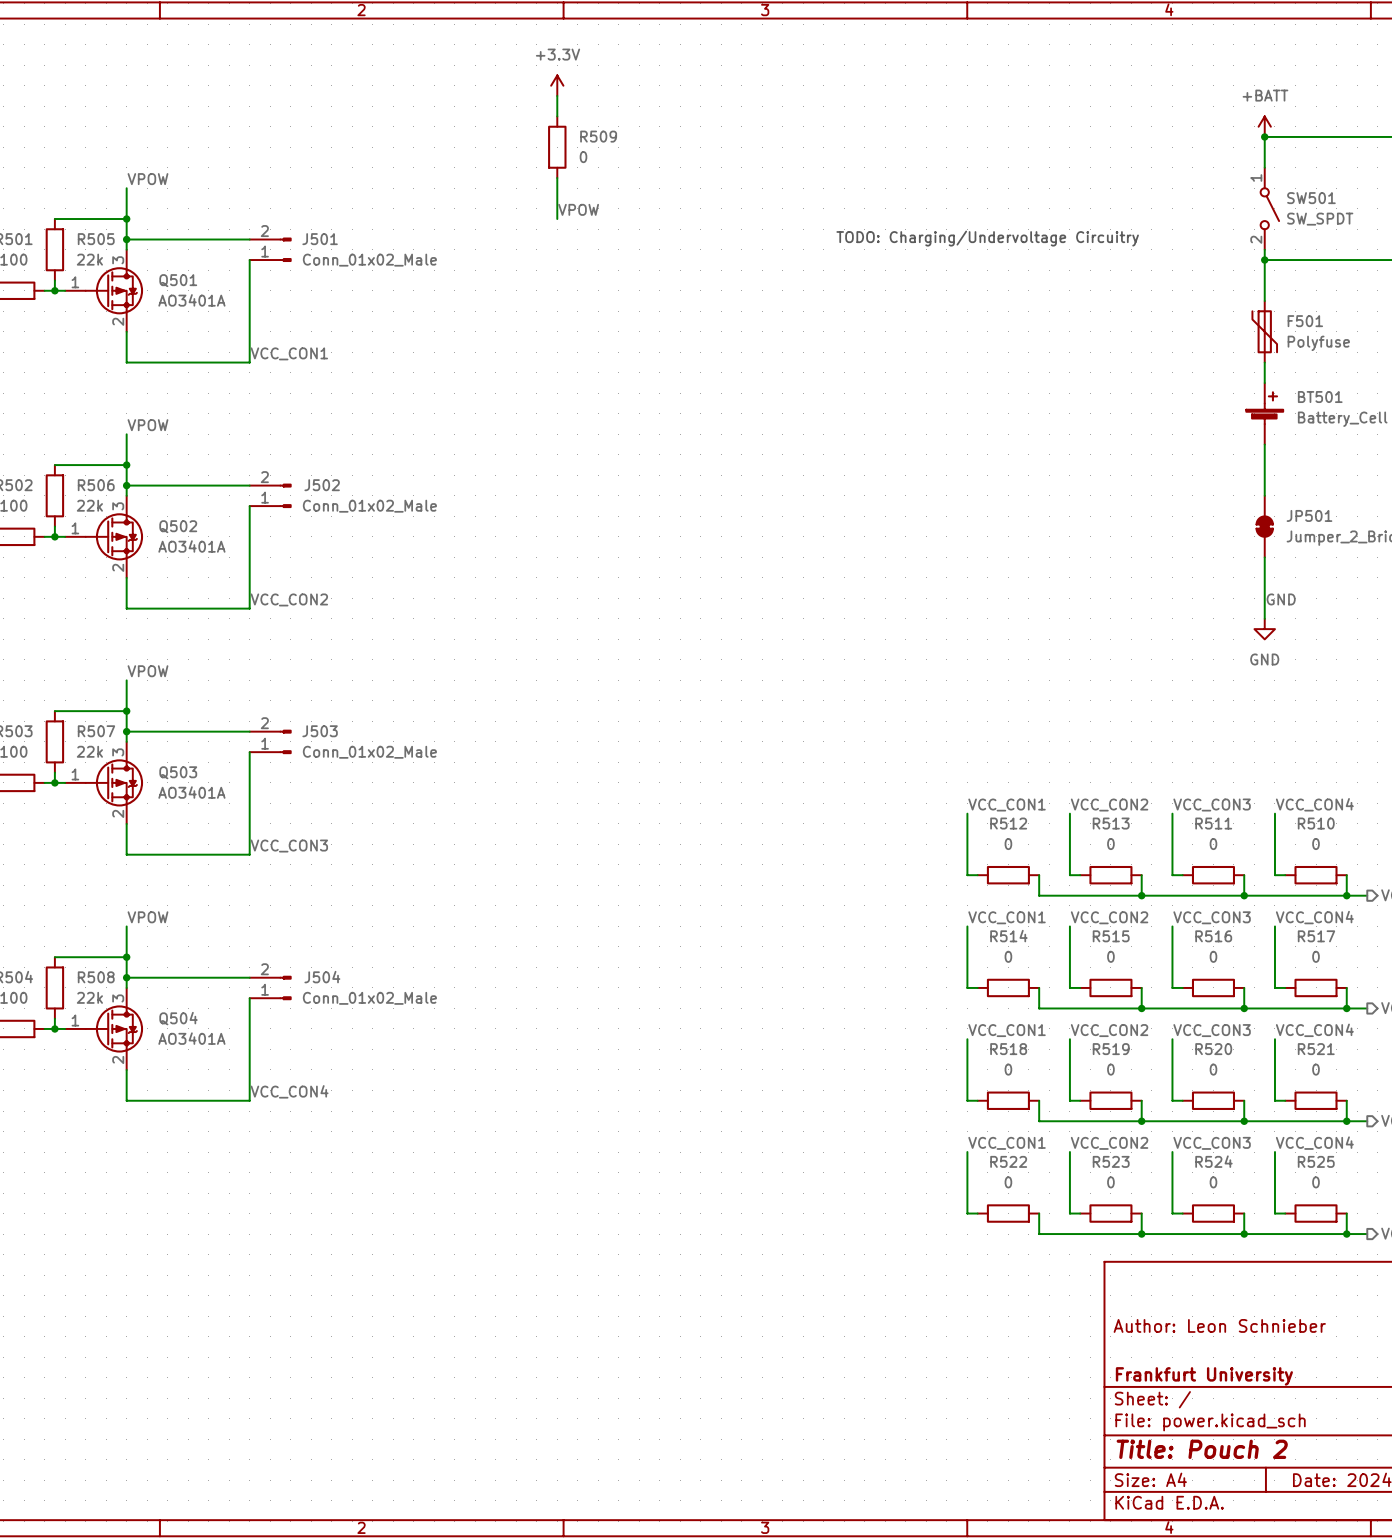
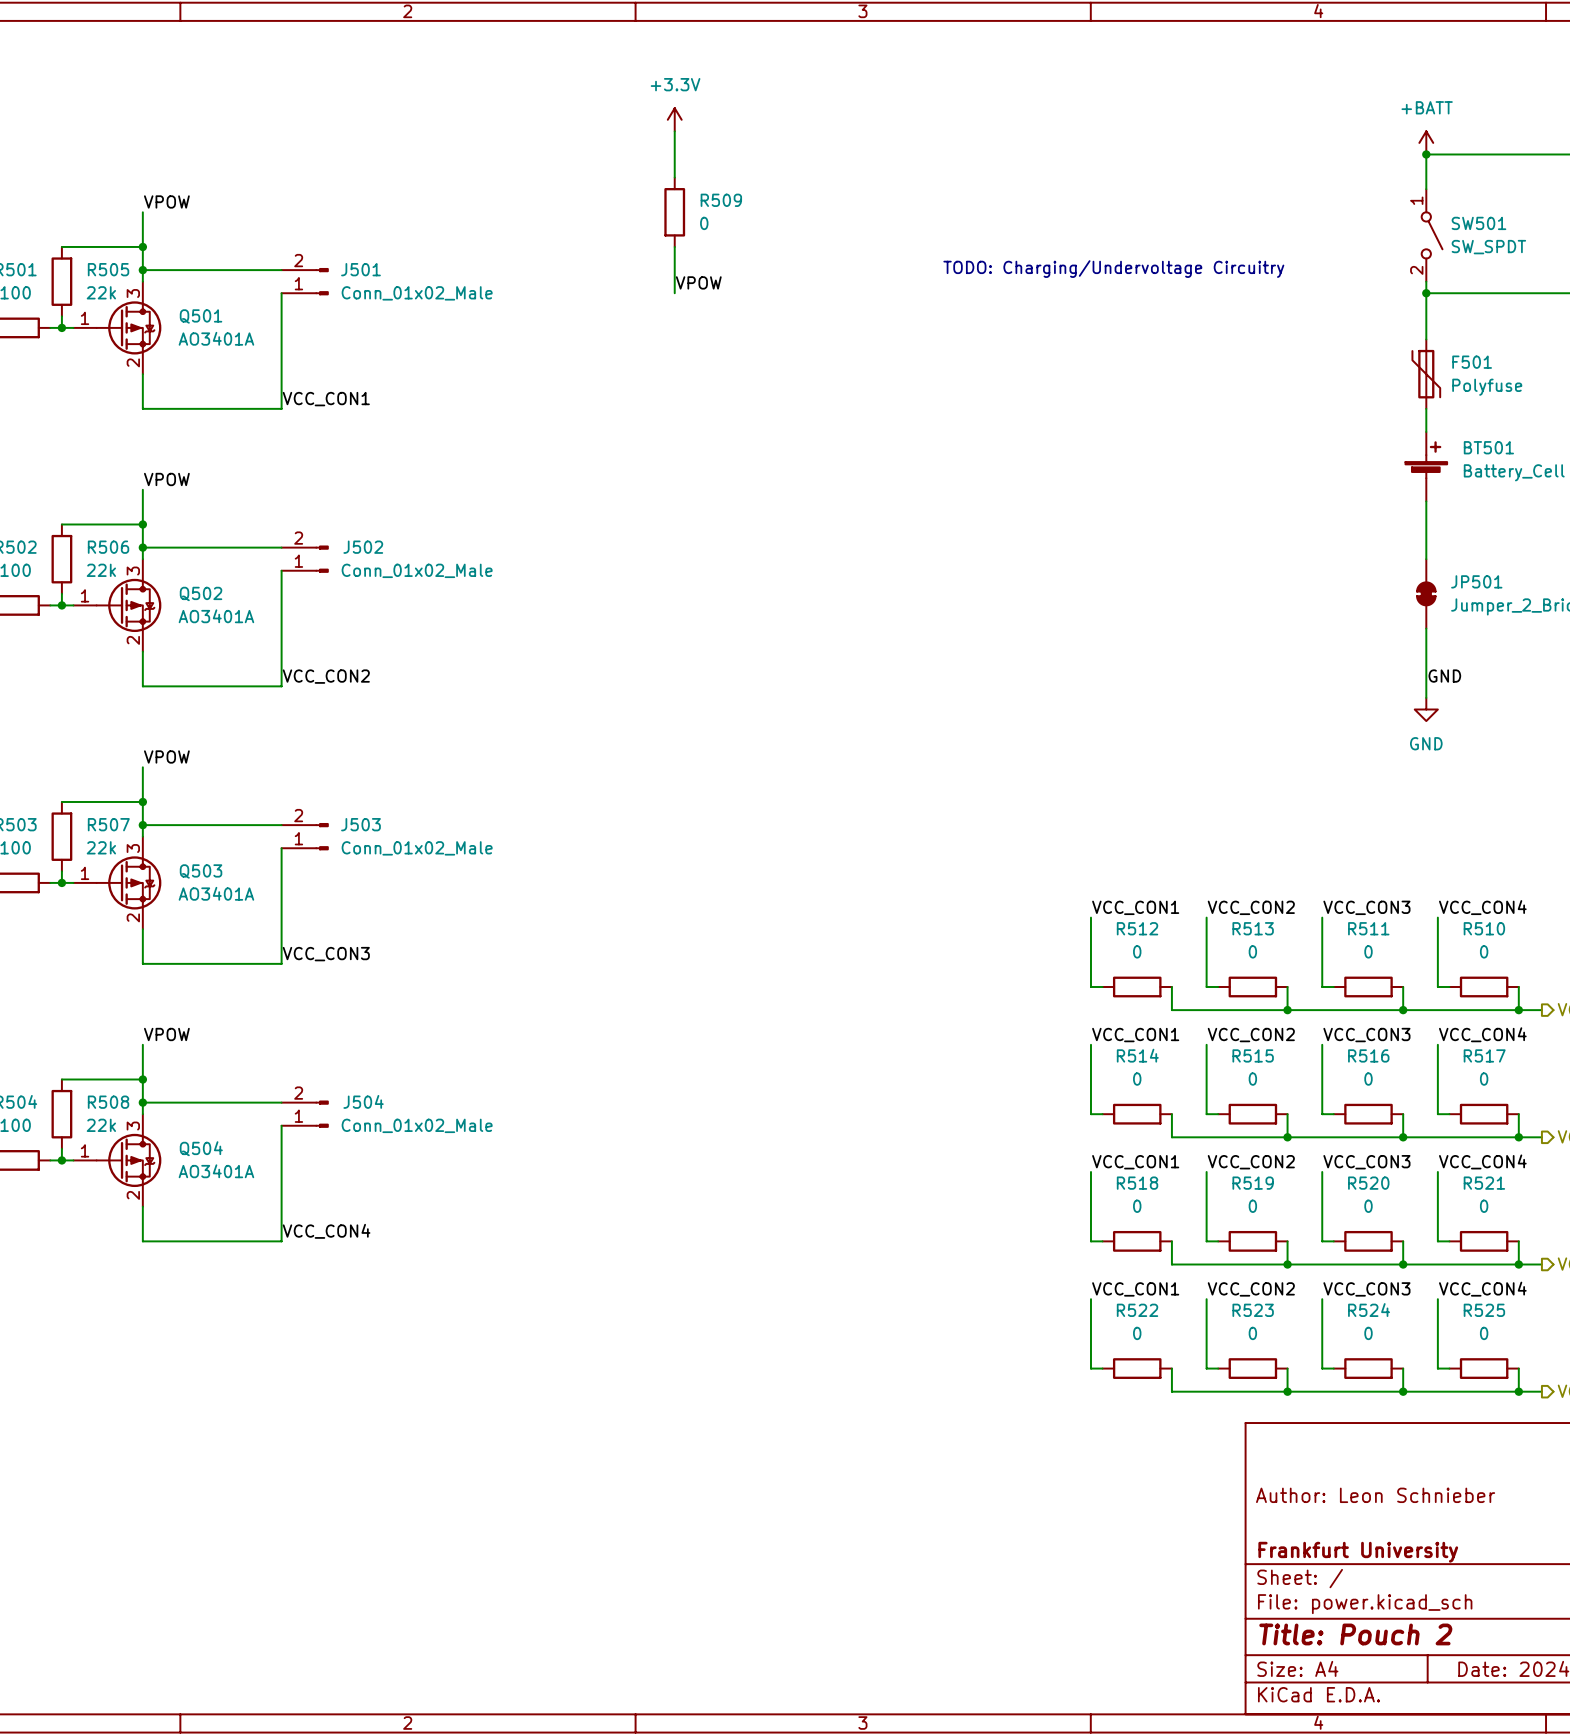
power symbol position: +3.3V (557, 85) -> +3.3V (674, 119)
wire: (557, 95) (557, 116) -> none
wire: none -> (674, 131) (674, 177)
R509 position: (557, 147) -> (674, 212)
wire: (557, 177) (557, 219) -> (674, 246) (674, 293)
label position: VPOW (578, 209) -> VPOW (698, 282)

